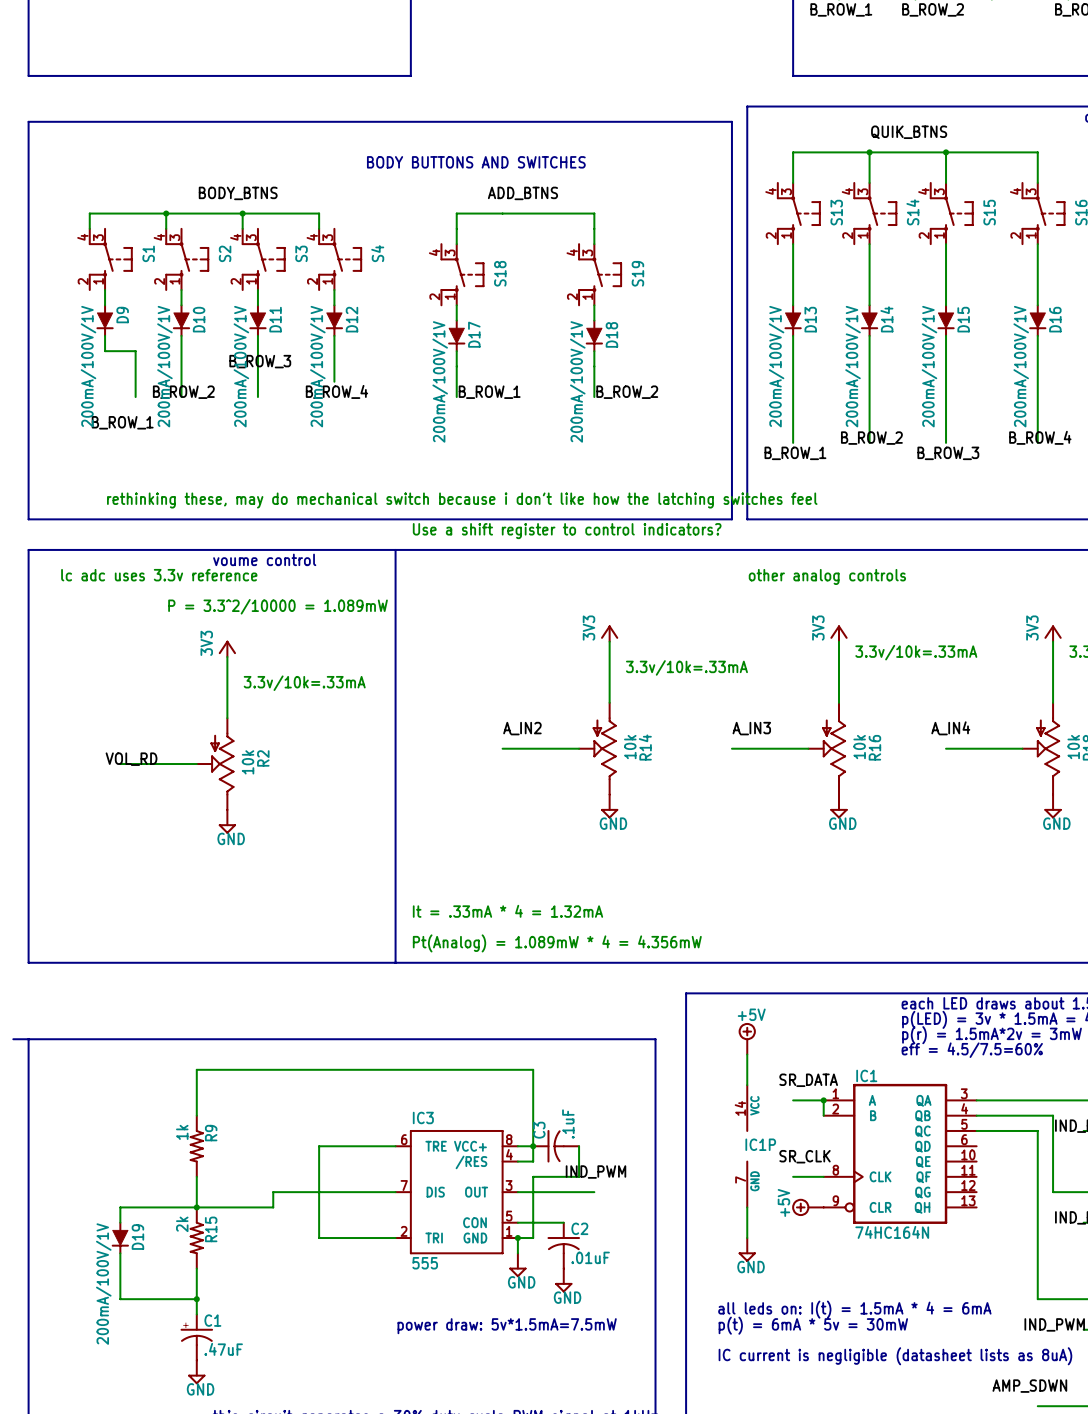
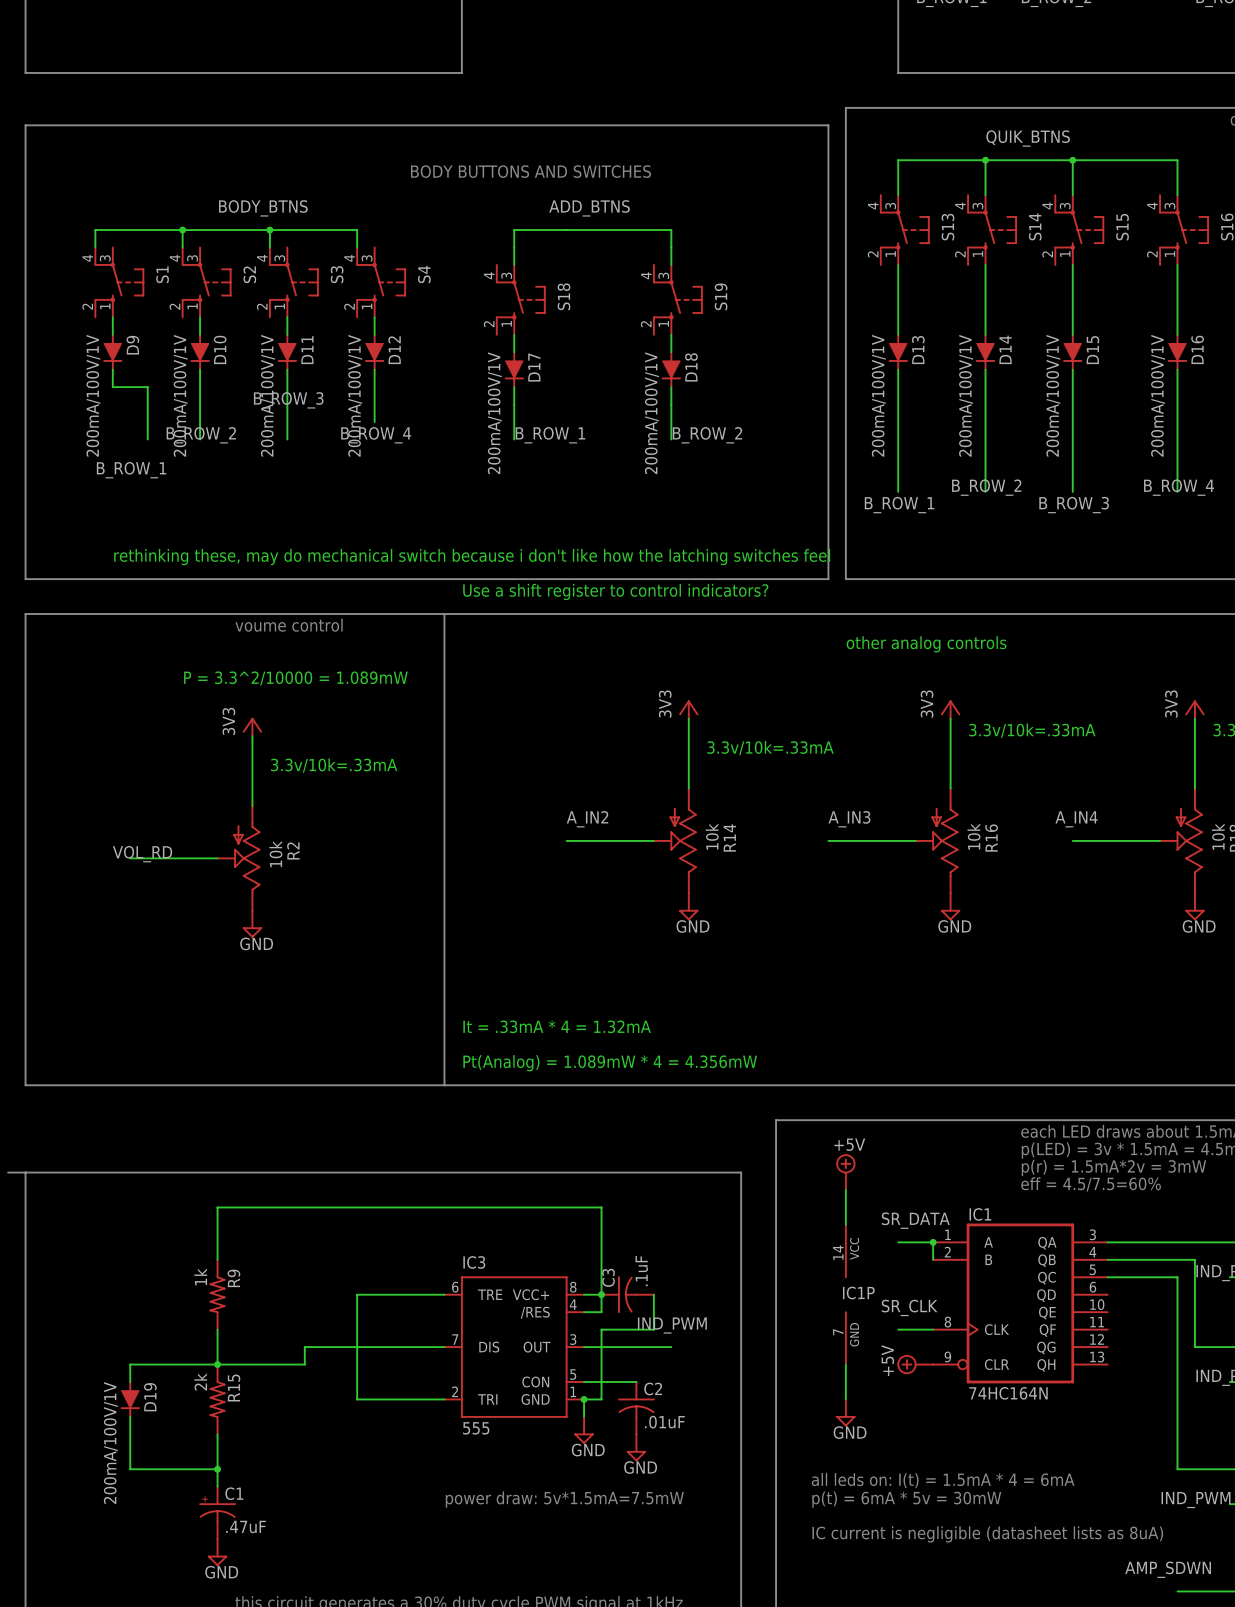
text: lc adc uses 3.3v reference (159, 575) -> none

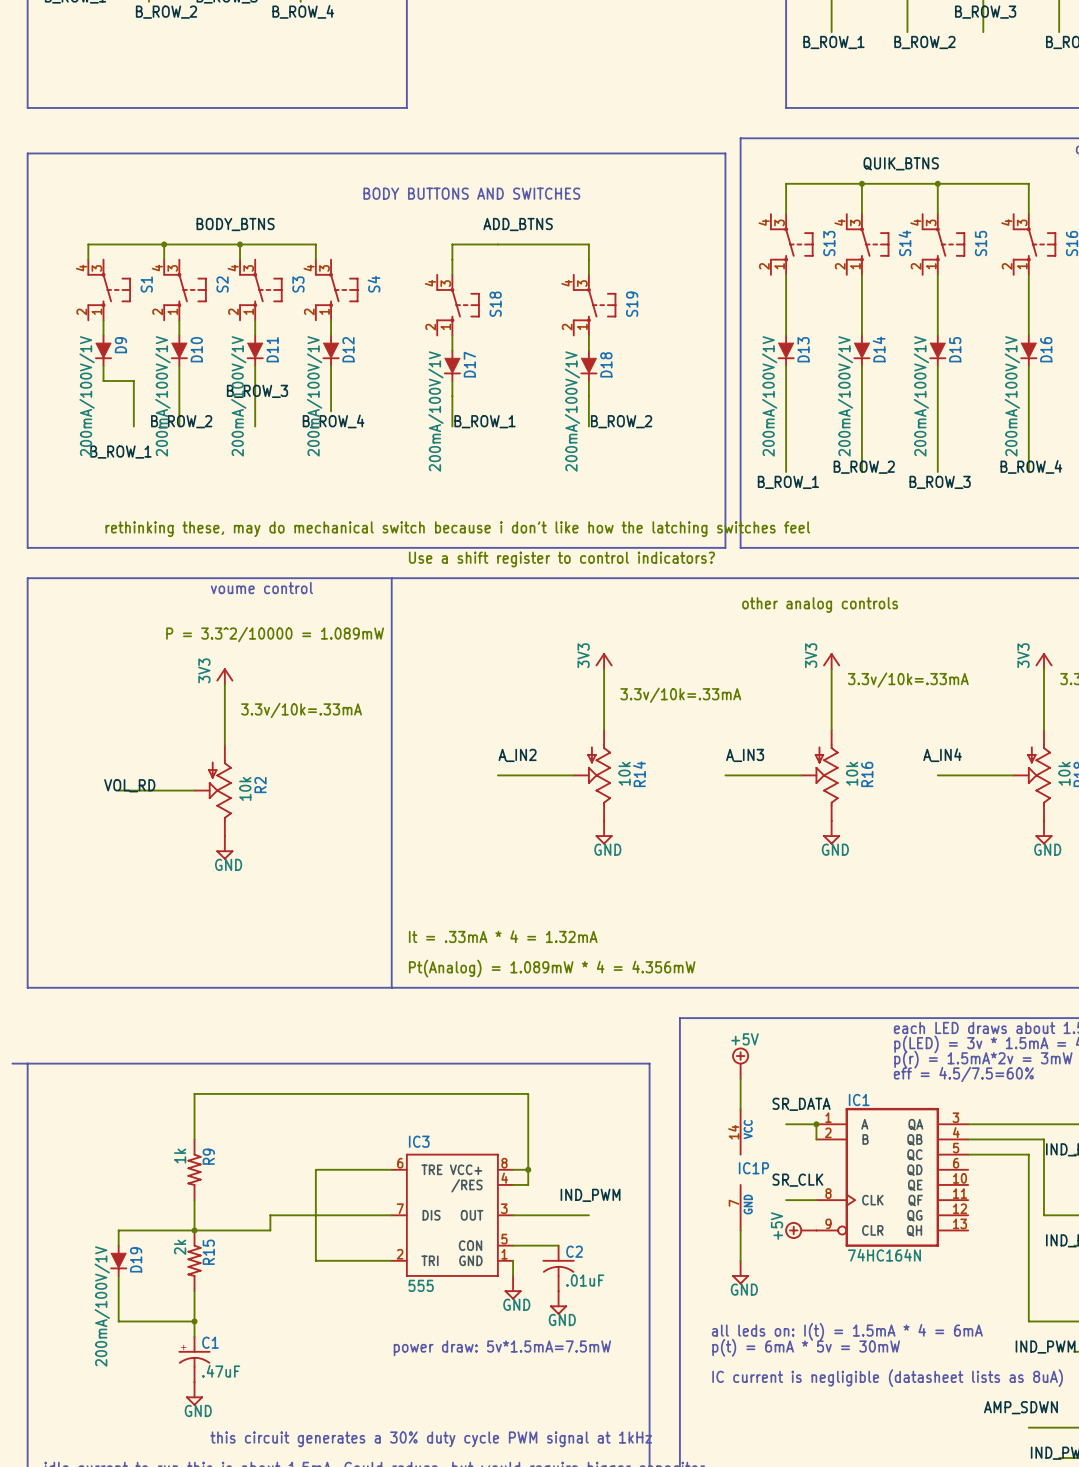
C3: .1uF (627, 1294) -> none
wire: (653, 1294) (653, 1329) (601, 1329) (601, 1399) (584, 1399) -> none
junction: (584, 1399) -> none

